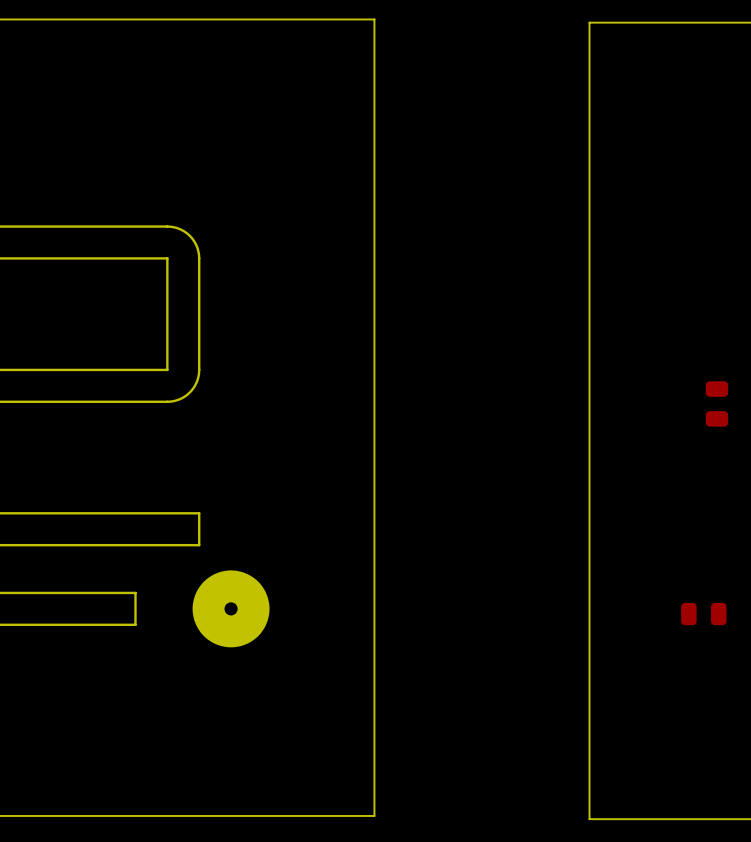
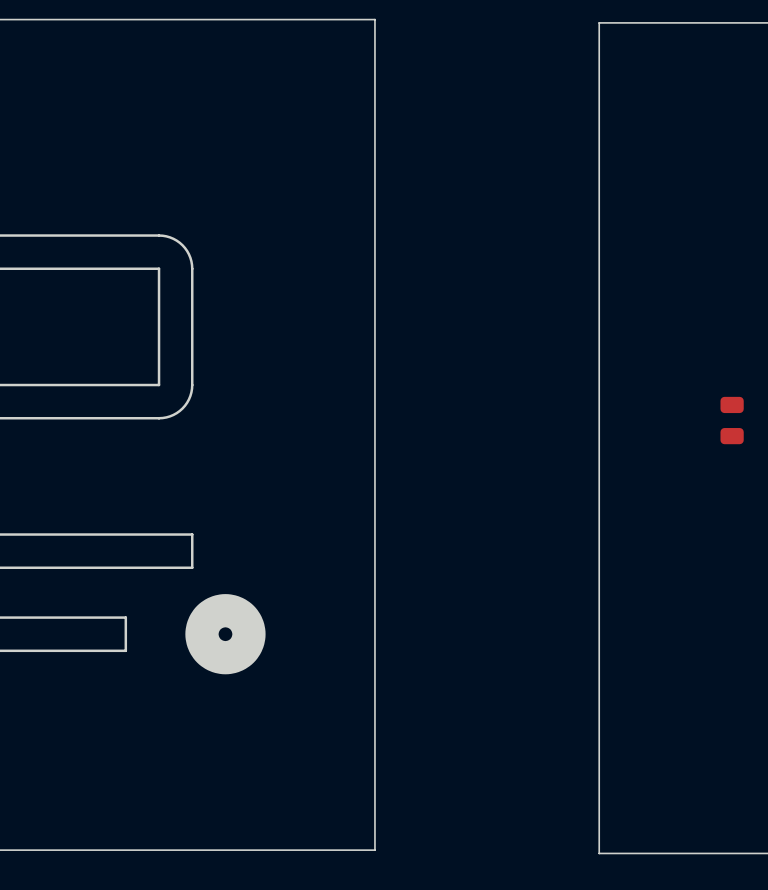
part: (703, 614) -> none

